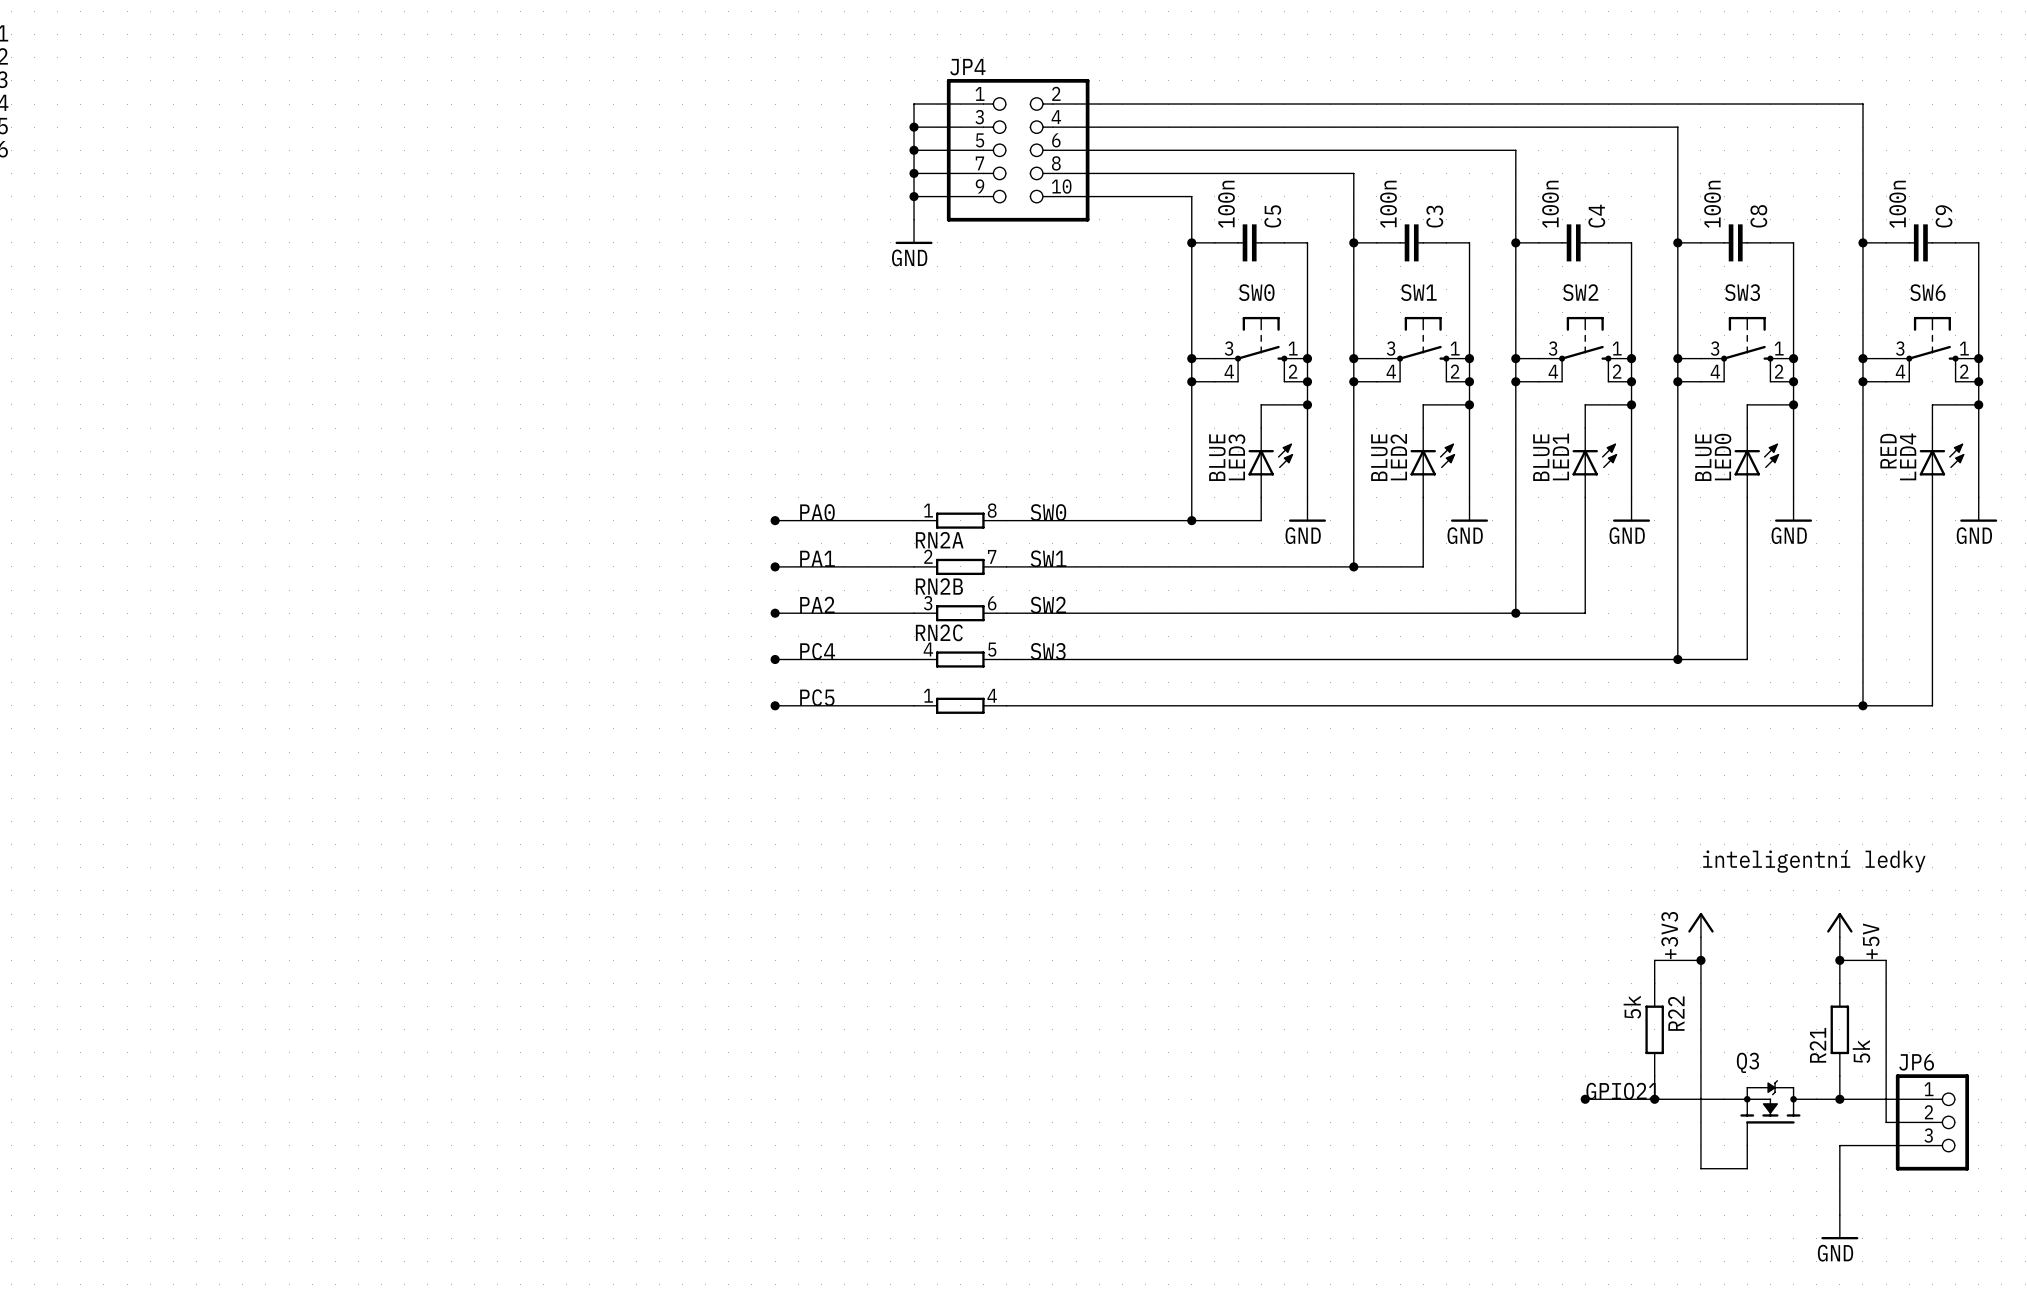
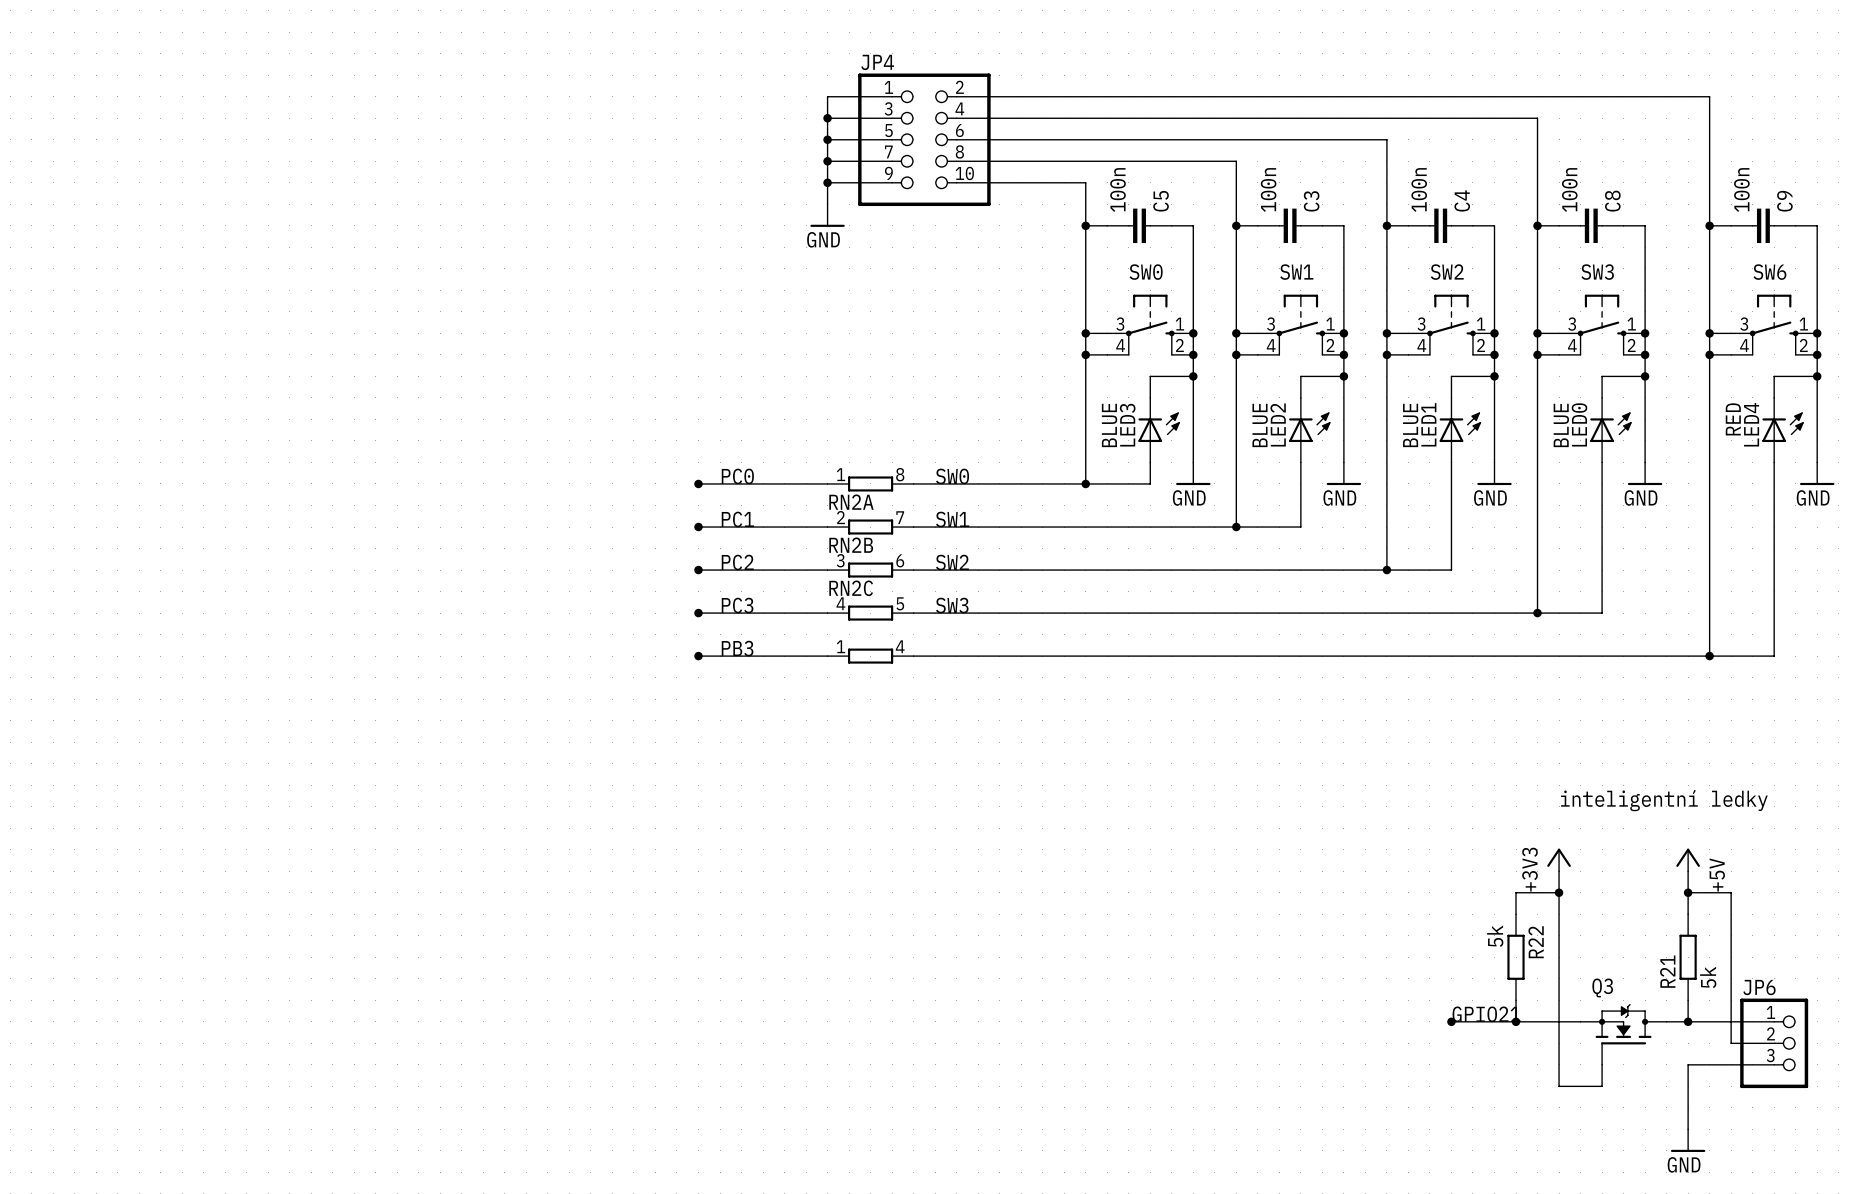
label: PA0 (817, 512) -> PC0 (737, 476)
label: PA1 (817, 558) -> PC1 (737, 519)
label: PA2 (817, 604) -> PC2 (737, 562)
label: PC4 (817, 651) -> PC3 (737, 605)
label: PC5 (817, 697) -> PB3 (737, 648)

